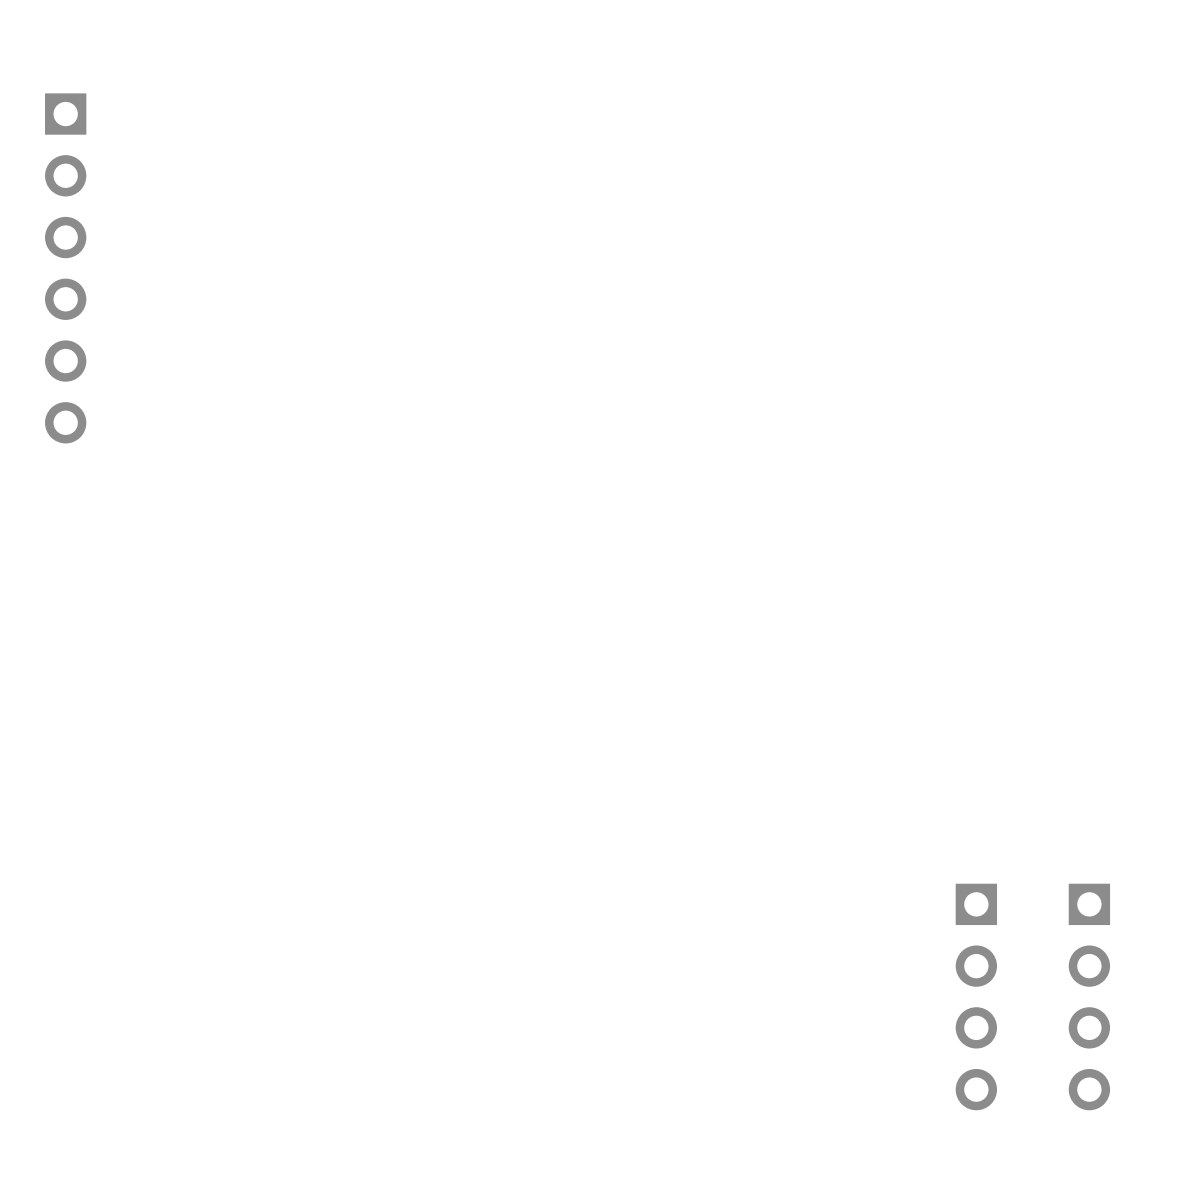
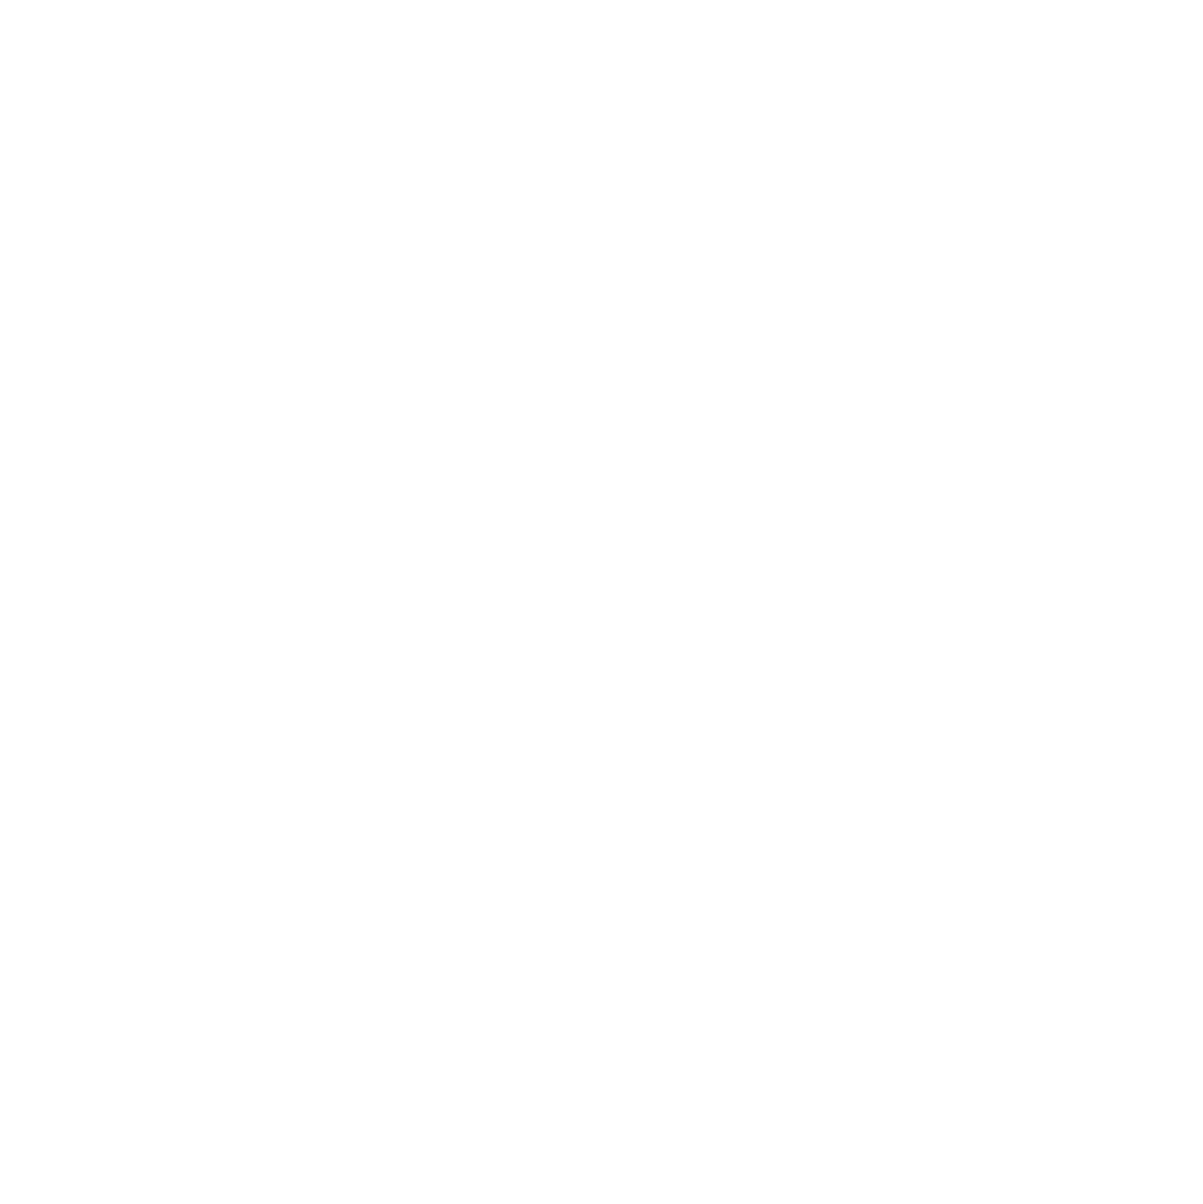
part: (65, 268) -> none
part: (976, 997) -> none
part: (1089, 997) -> none

